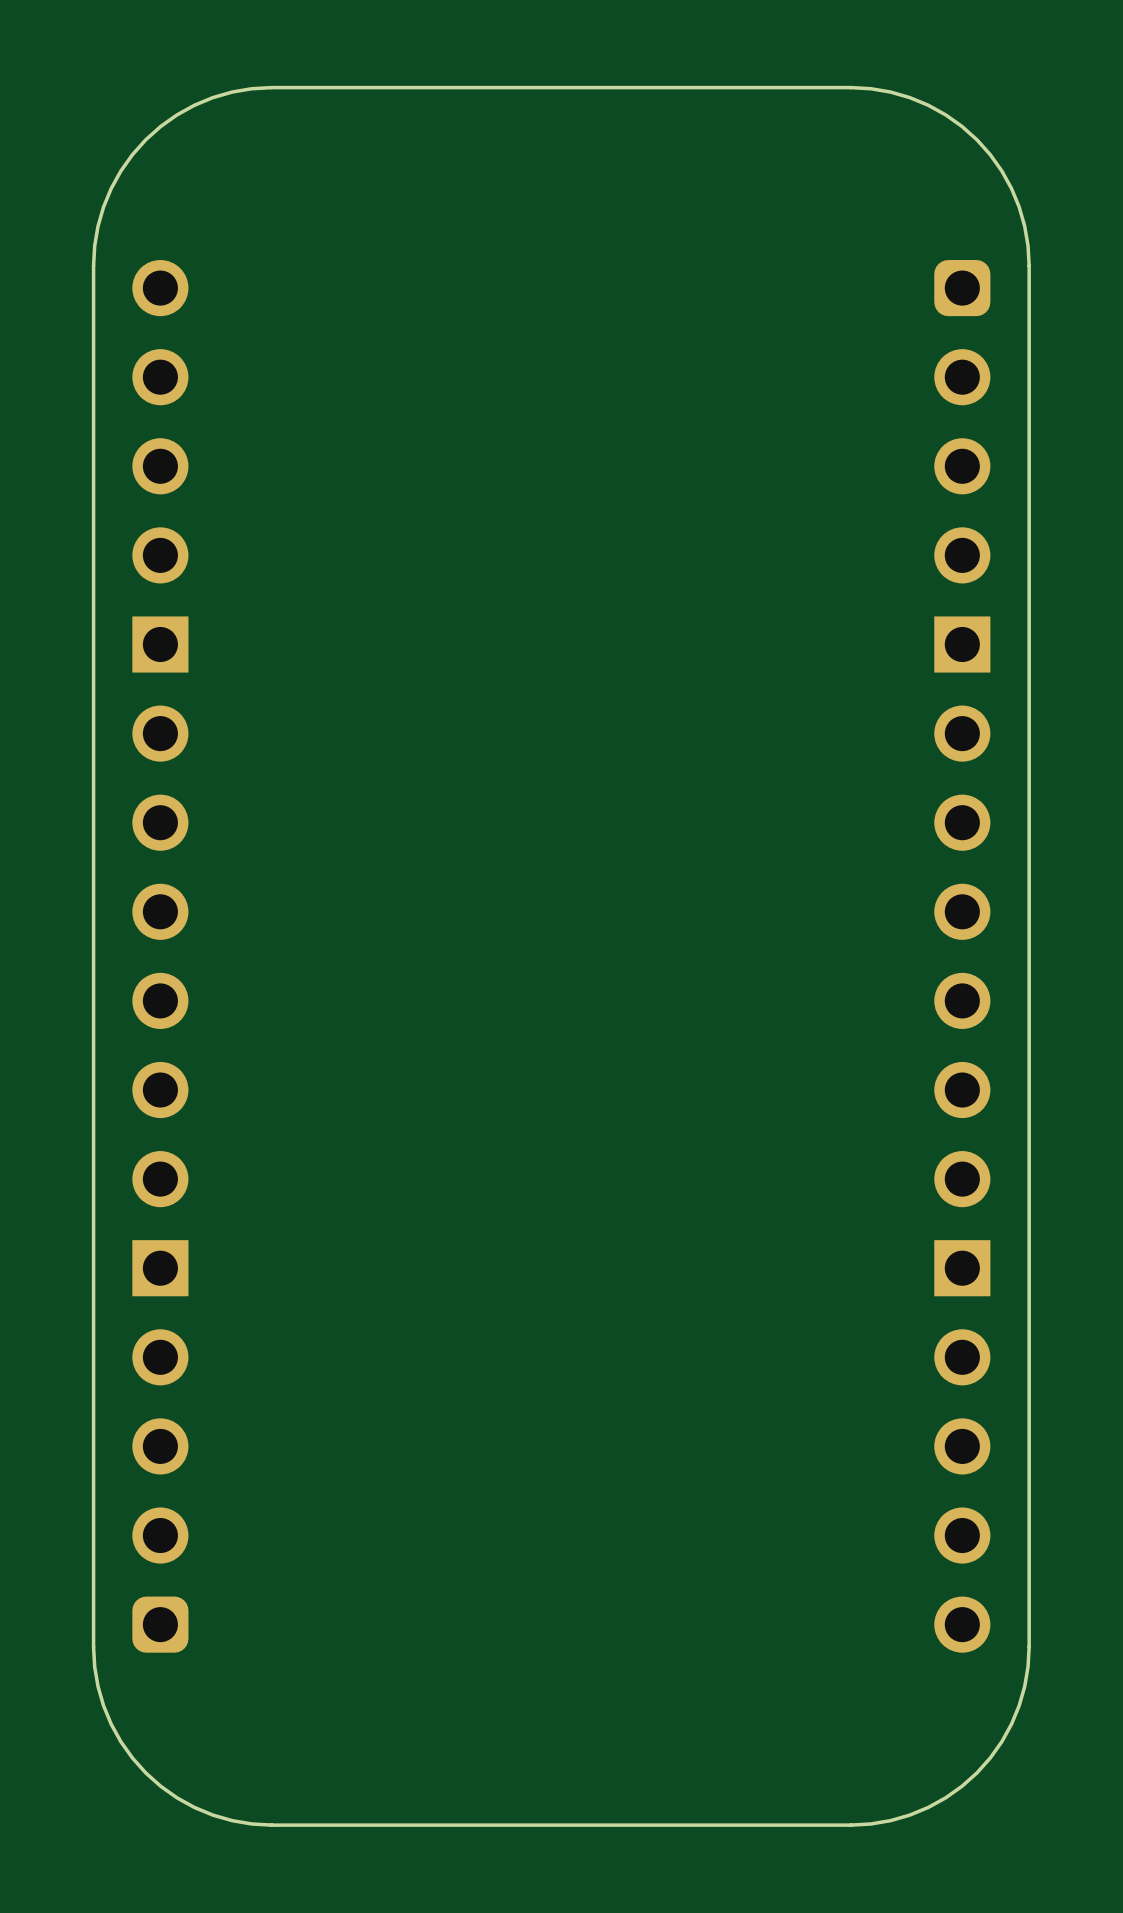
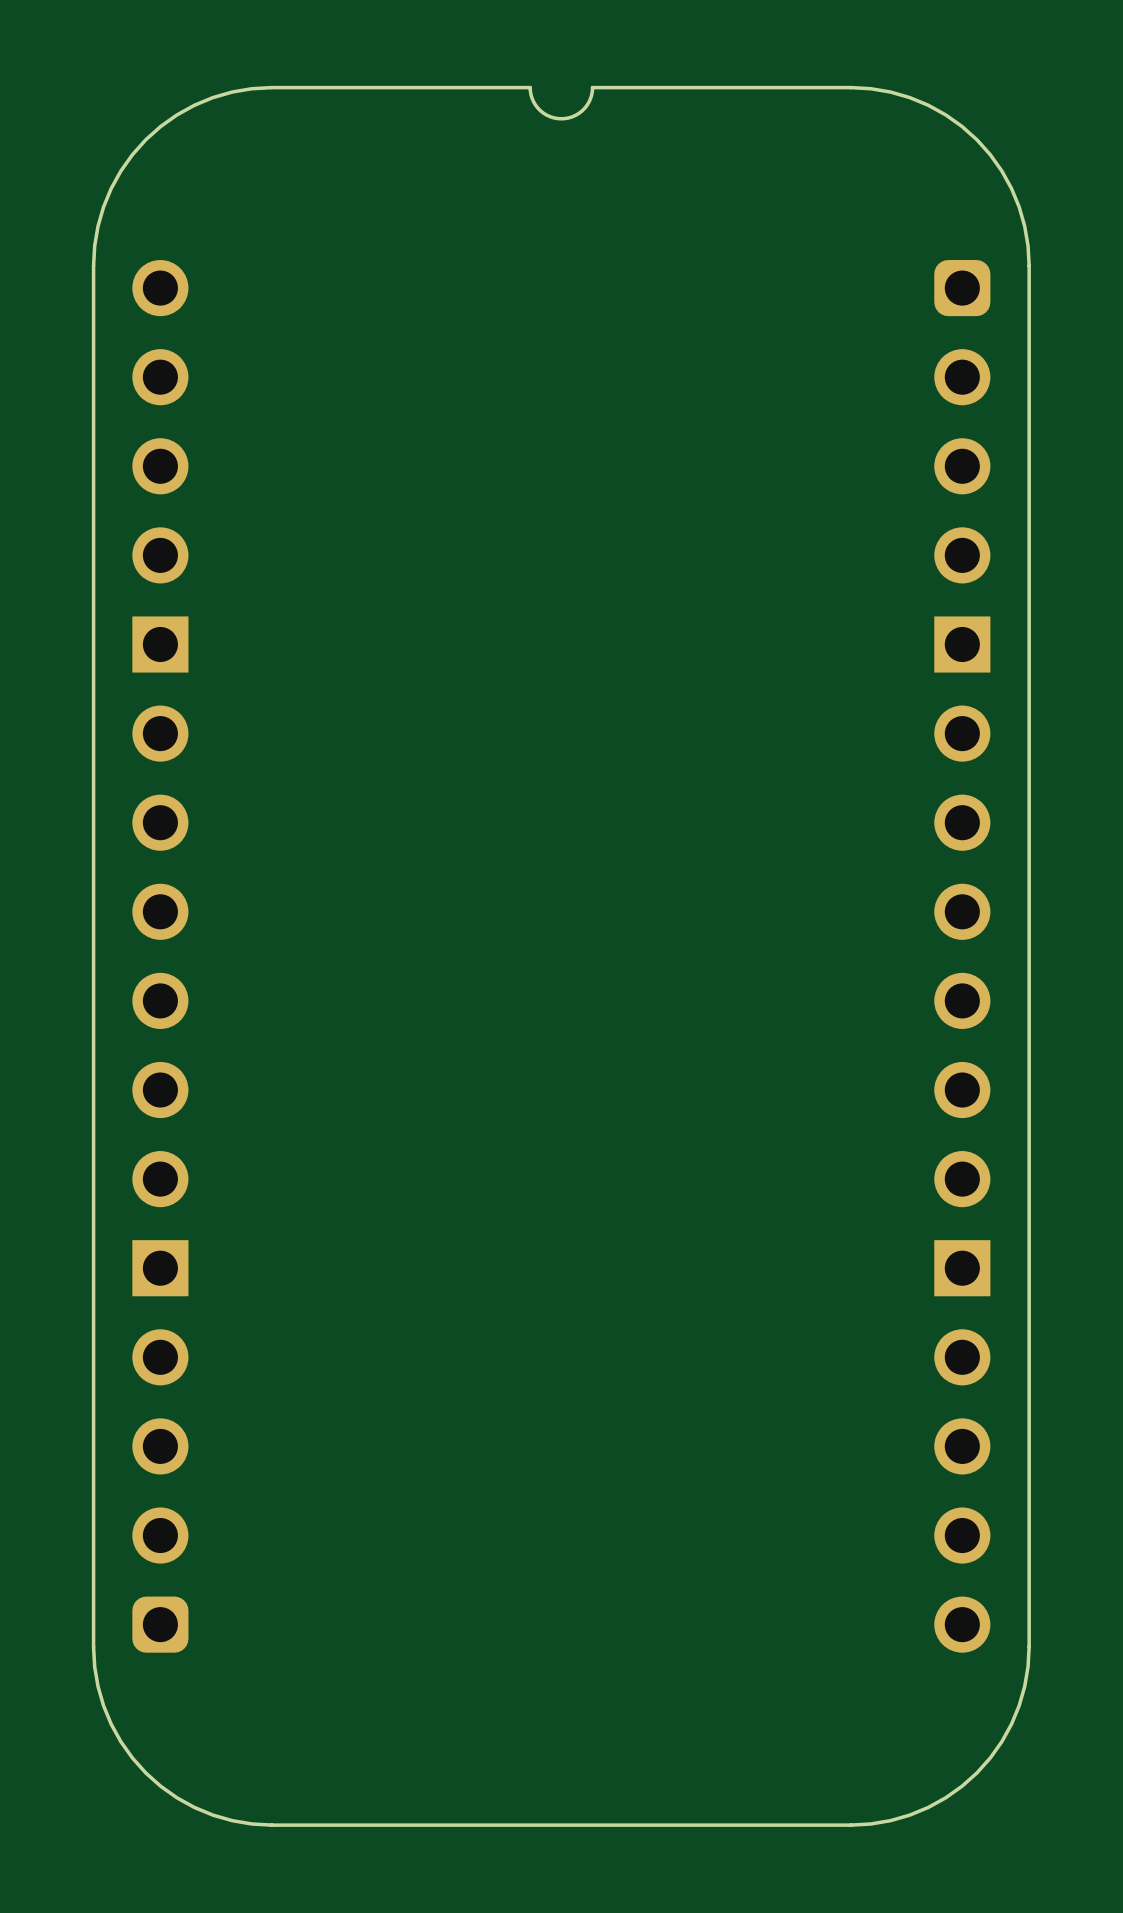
part footprint: [91, 85, 1031, 1827] -> [91, 85, 1031, 1827]

